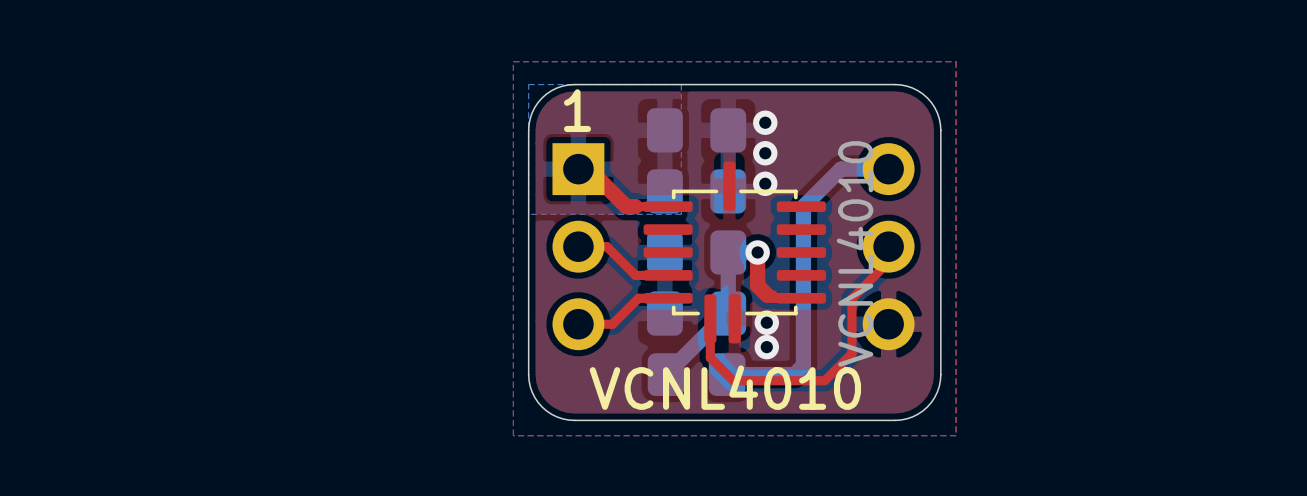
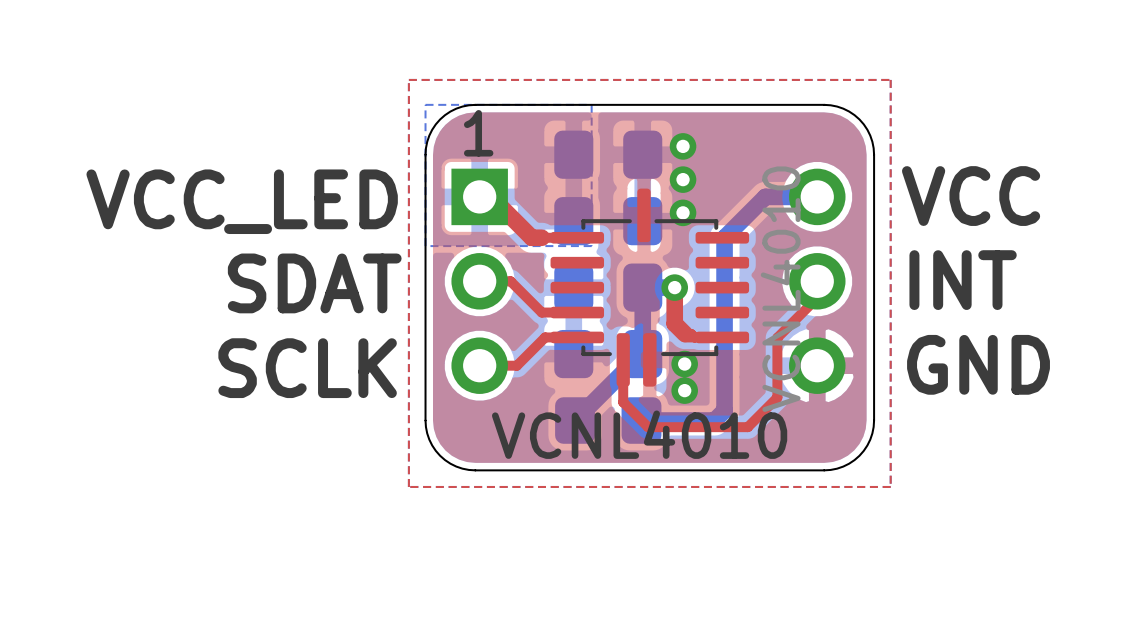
text: none -> VCC (971, 196)
text: none -> VCC_LED (242, 201)
text: none -> INT (963, 280)
text: none -> SDAT (314, 283)
text: none -> GND (978, 364)
text: none -> SCLK (307, 368)

